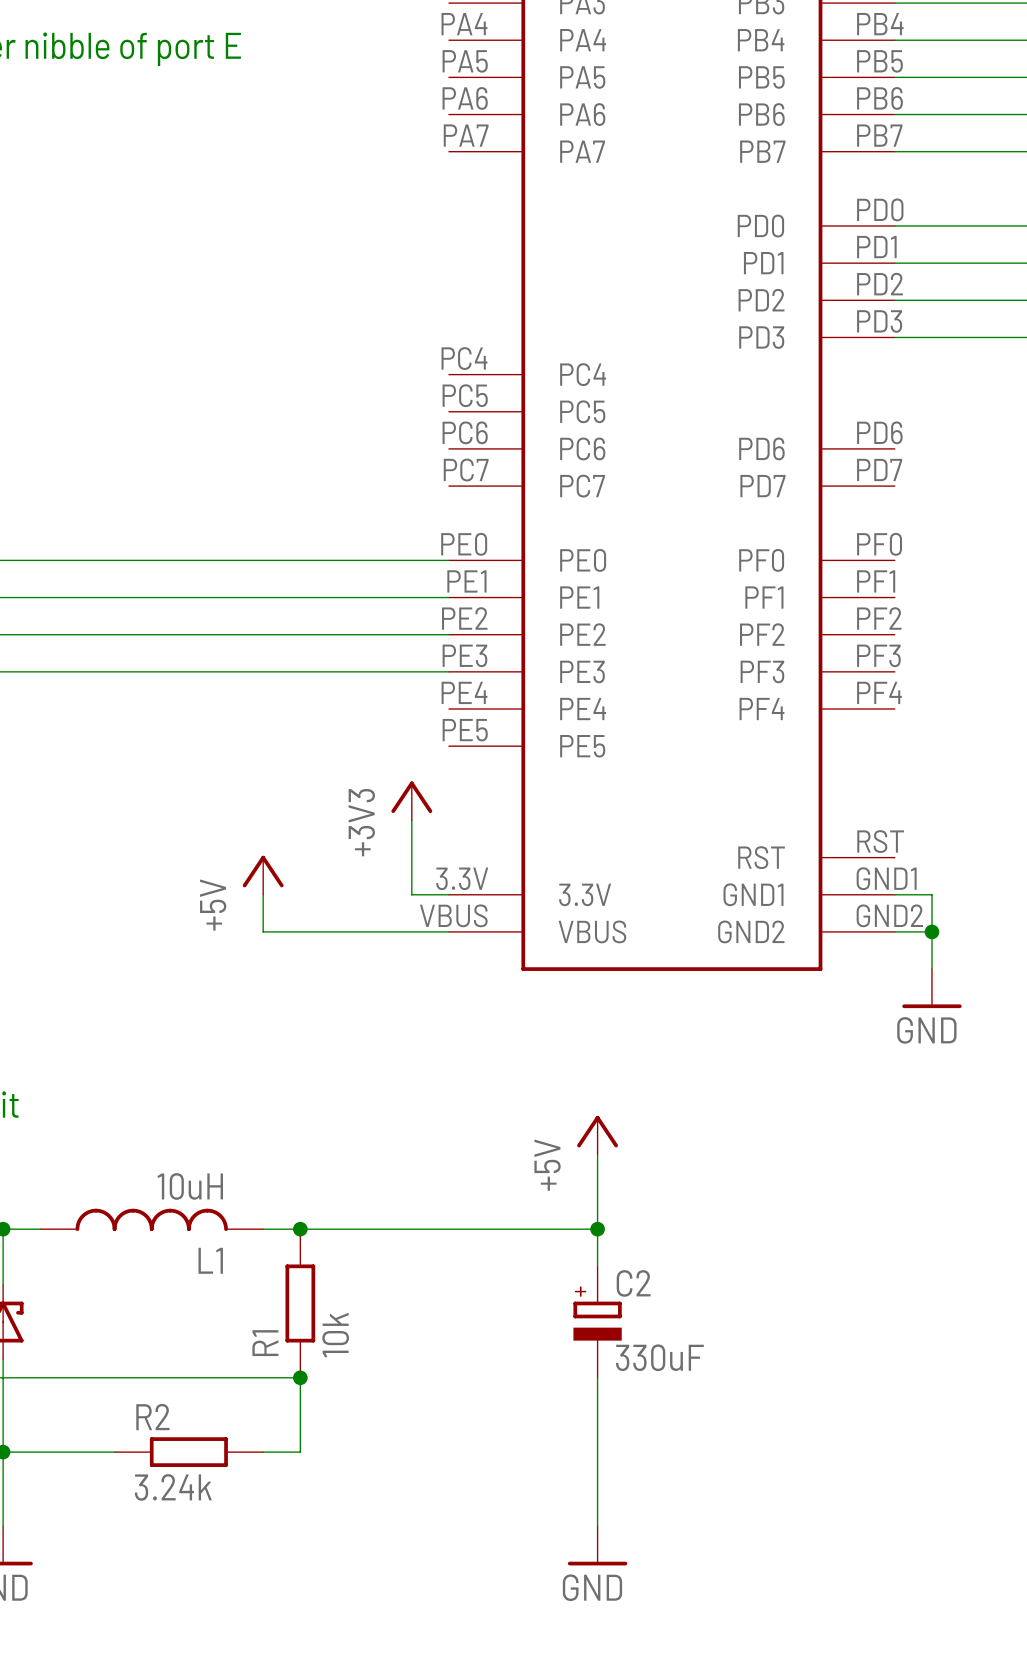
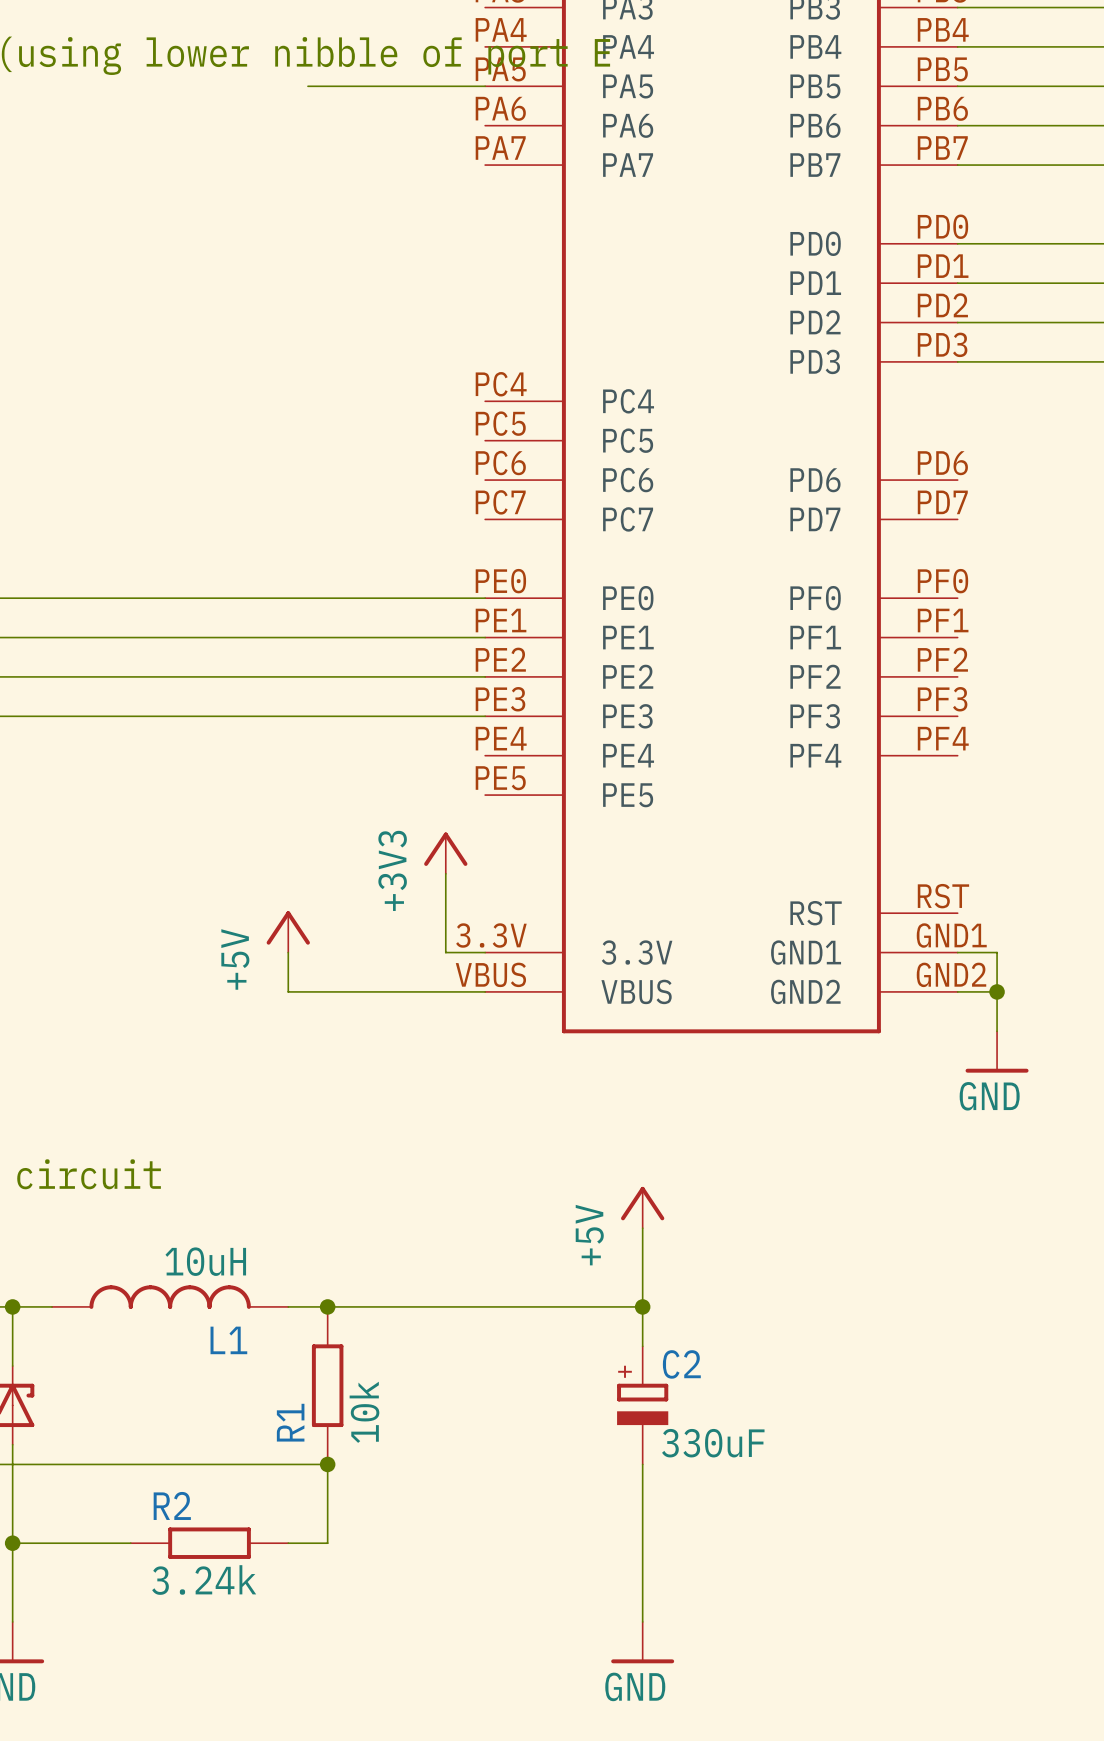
wire: none -> (307, 86) (485, 86)

